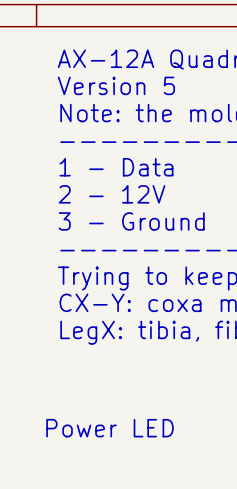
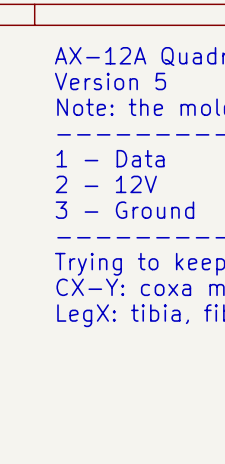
text: Power LED (110, 428) -> none

